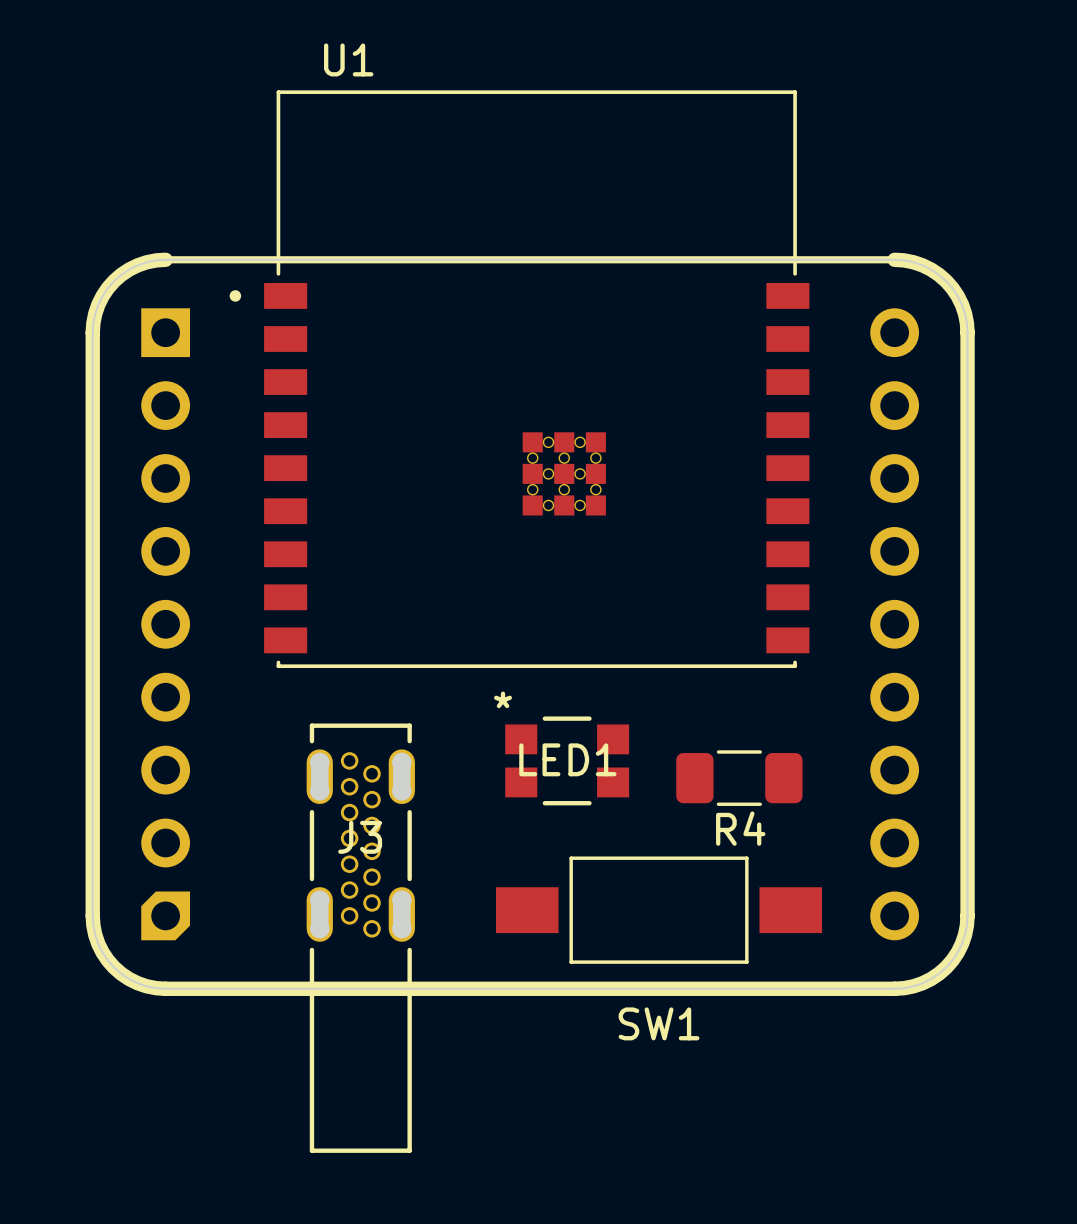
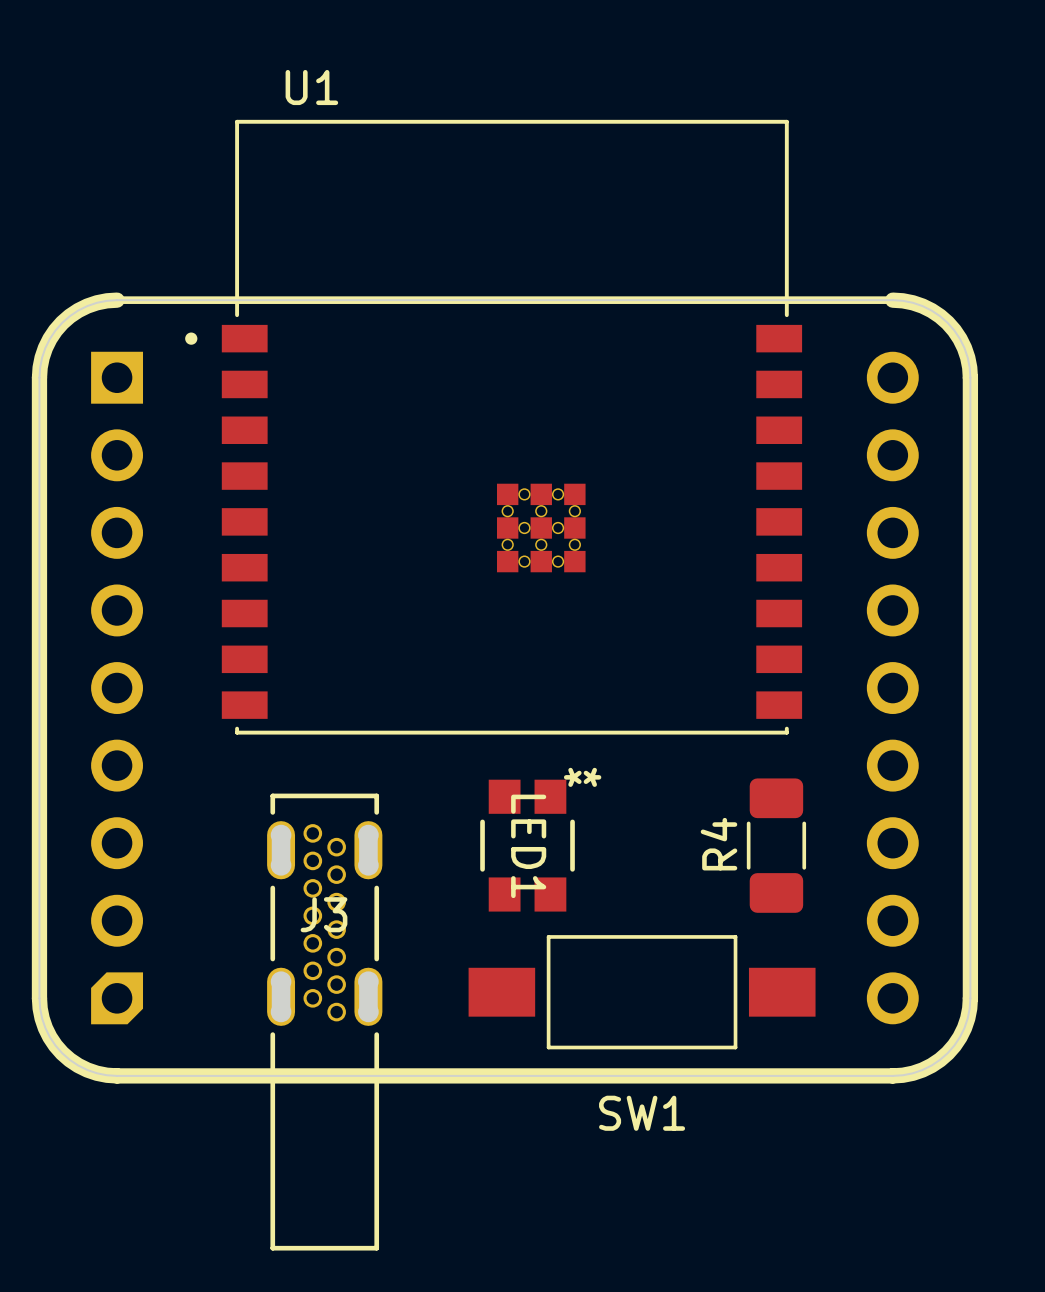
LED1 rotation: 0° (567, 760) -> 90° clockwise (527, 845)
R4 rotation: 0° (739, 778) -> 90° clockwise (776, 845)

